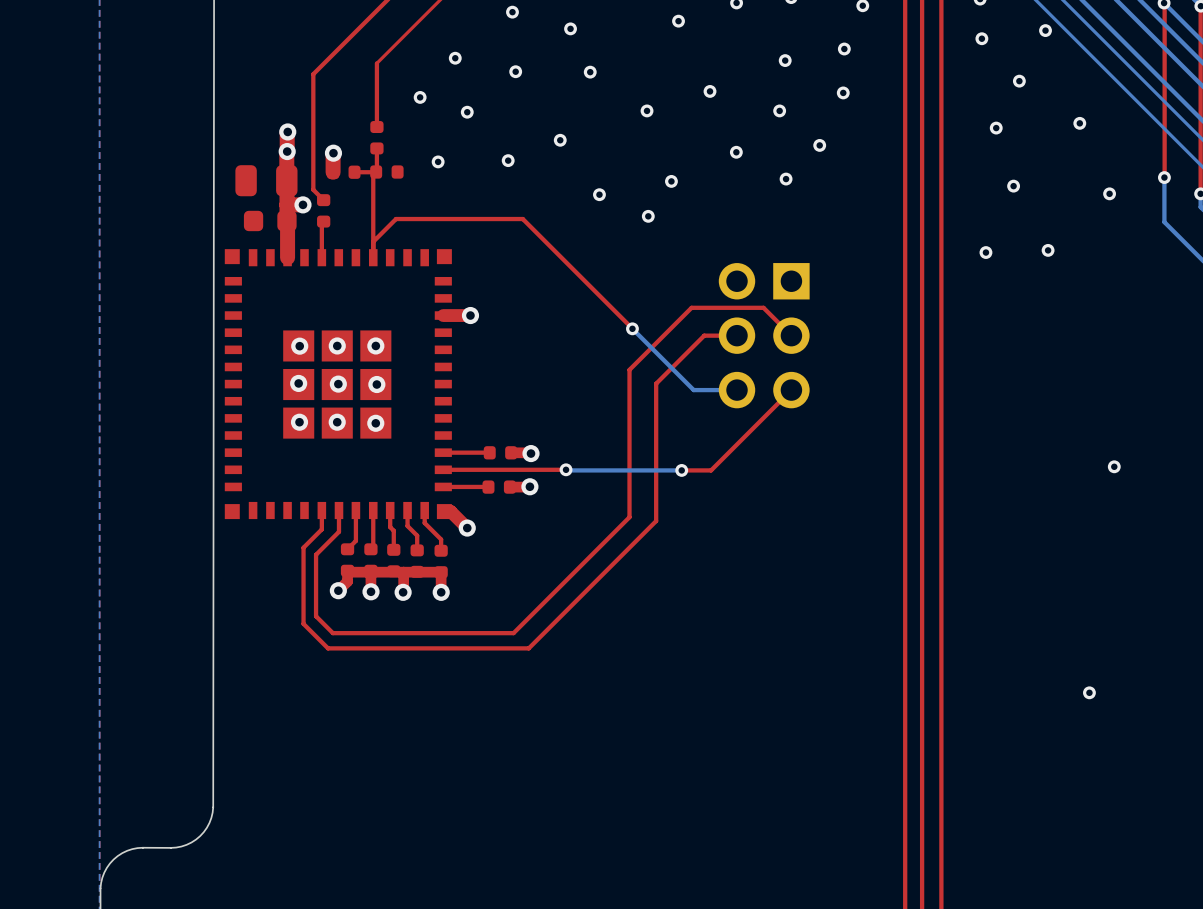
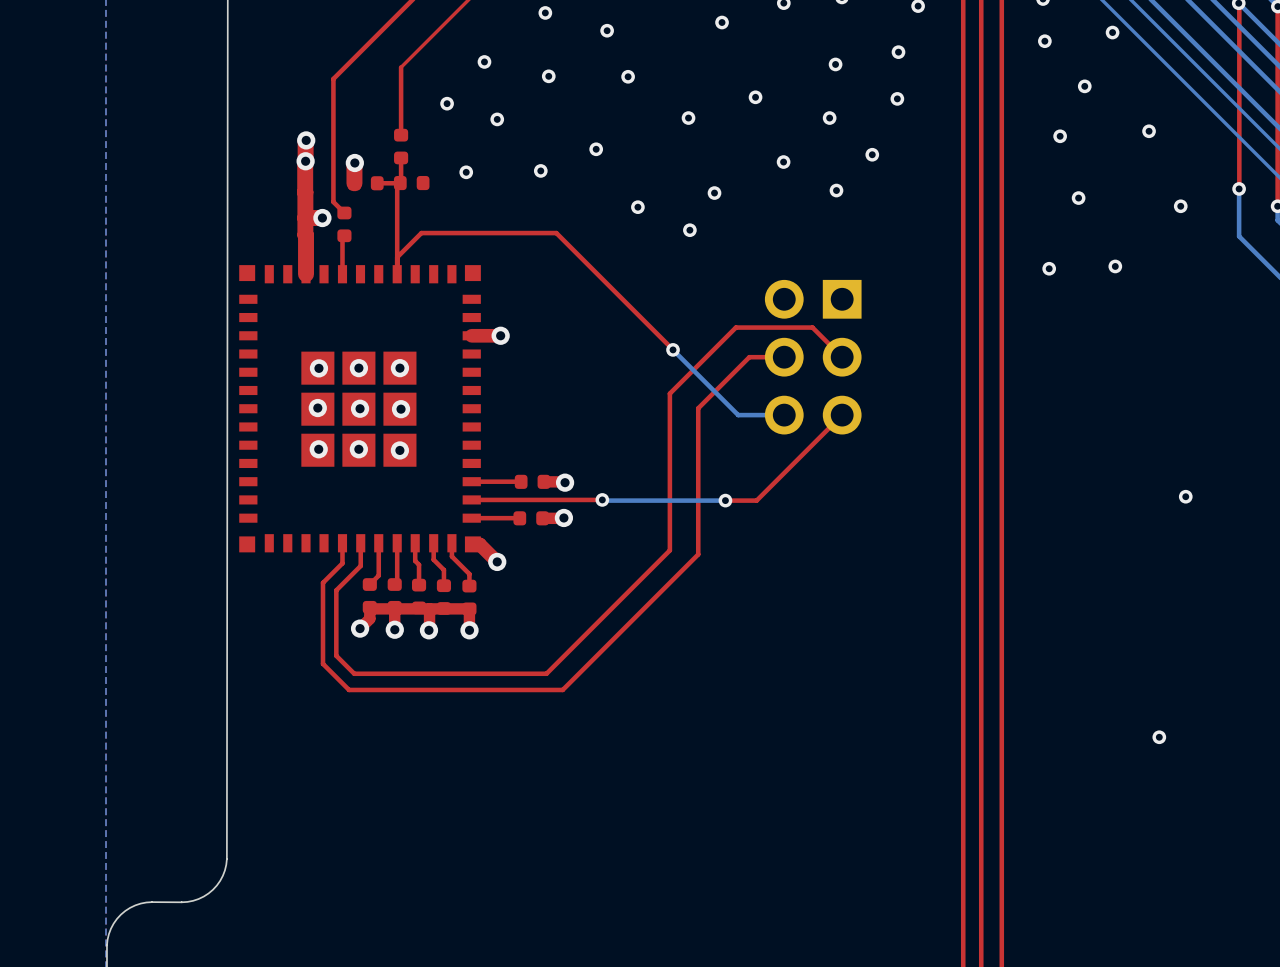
part: (266, 180) -> none
part: (270, 220) -> none

